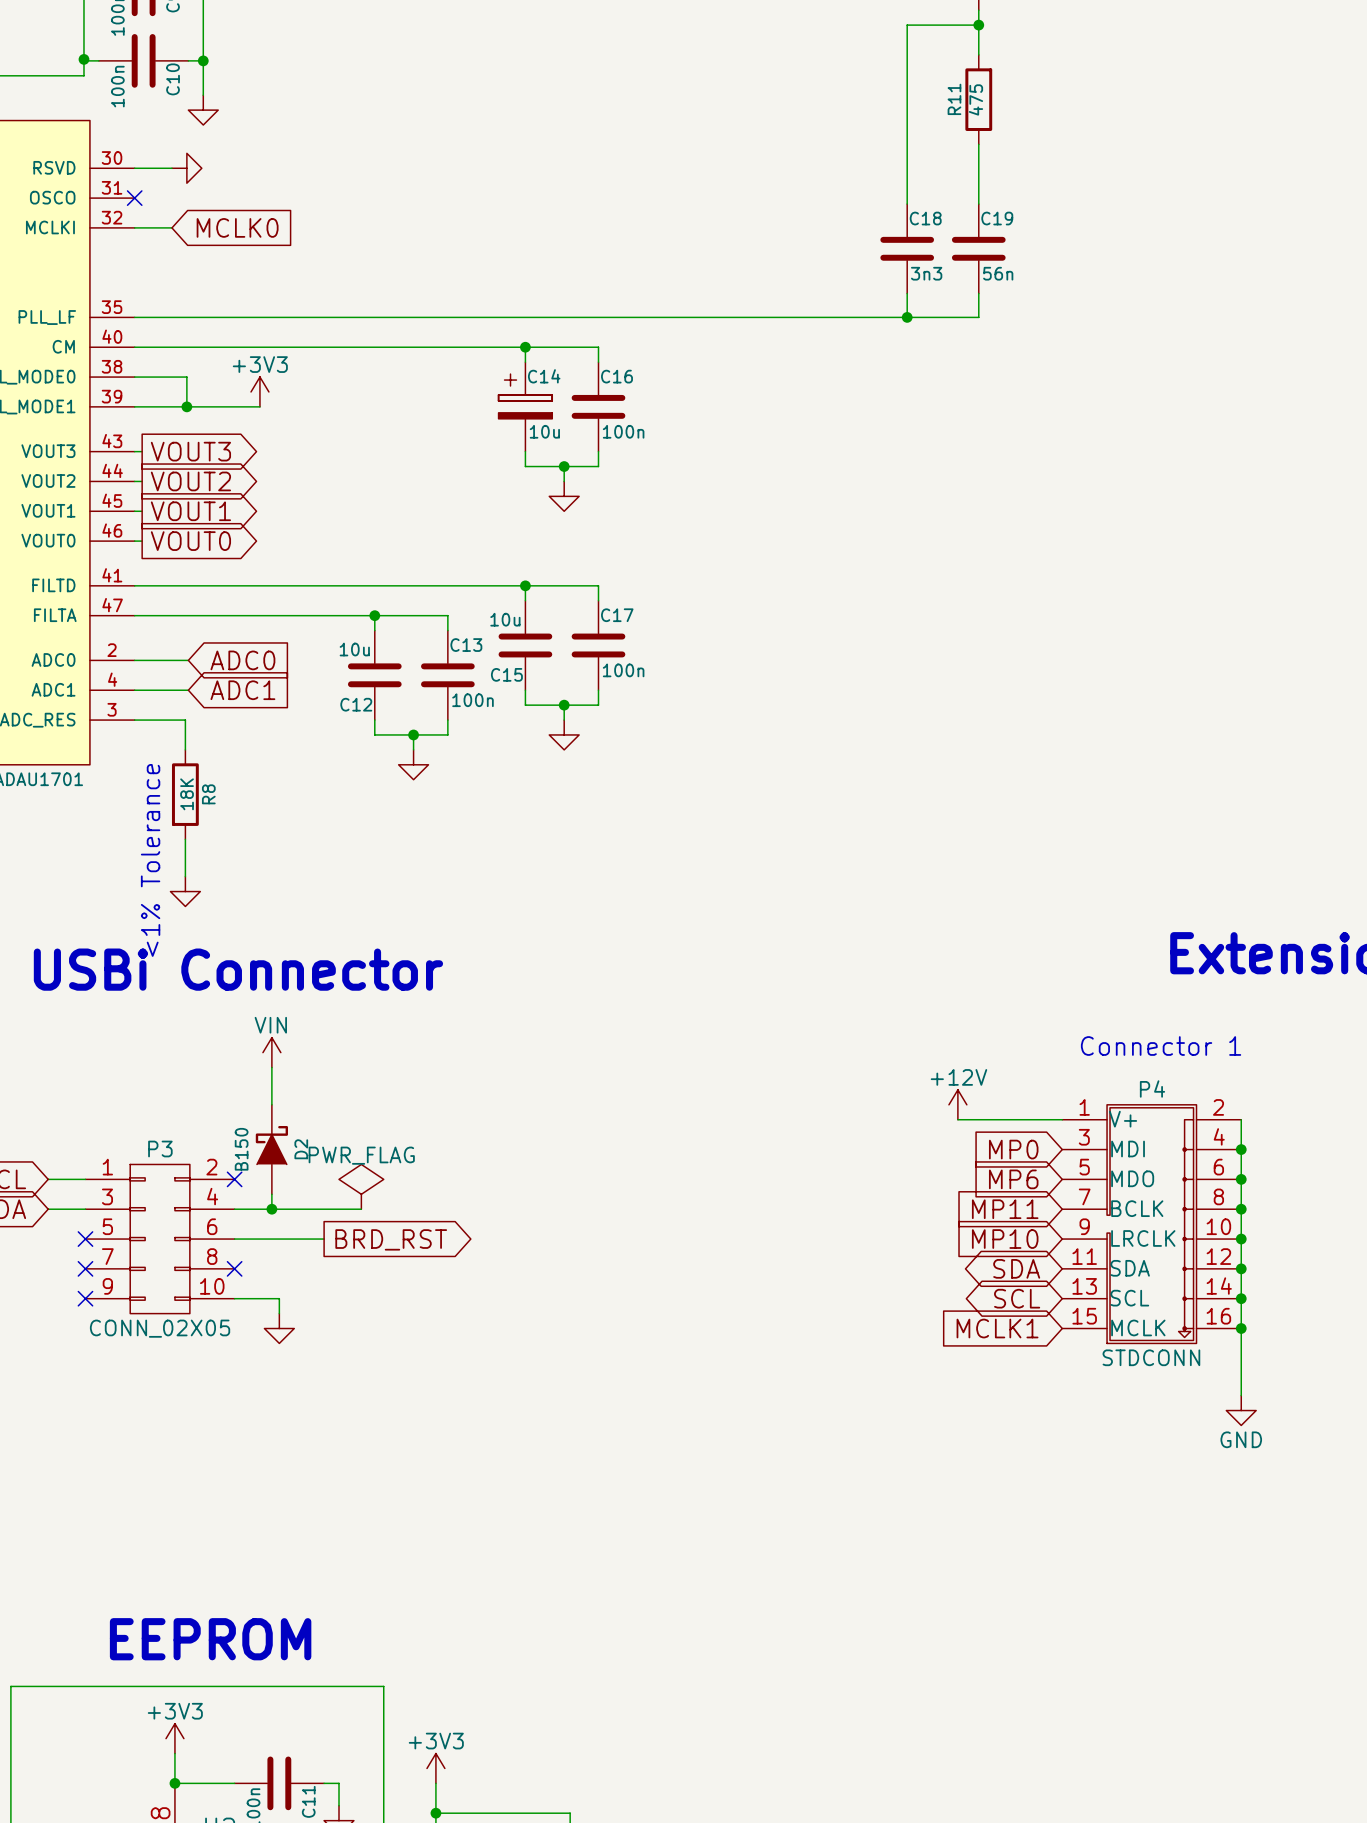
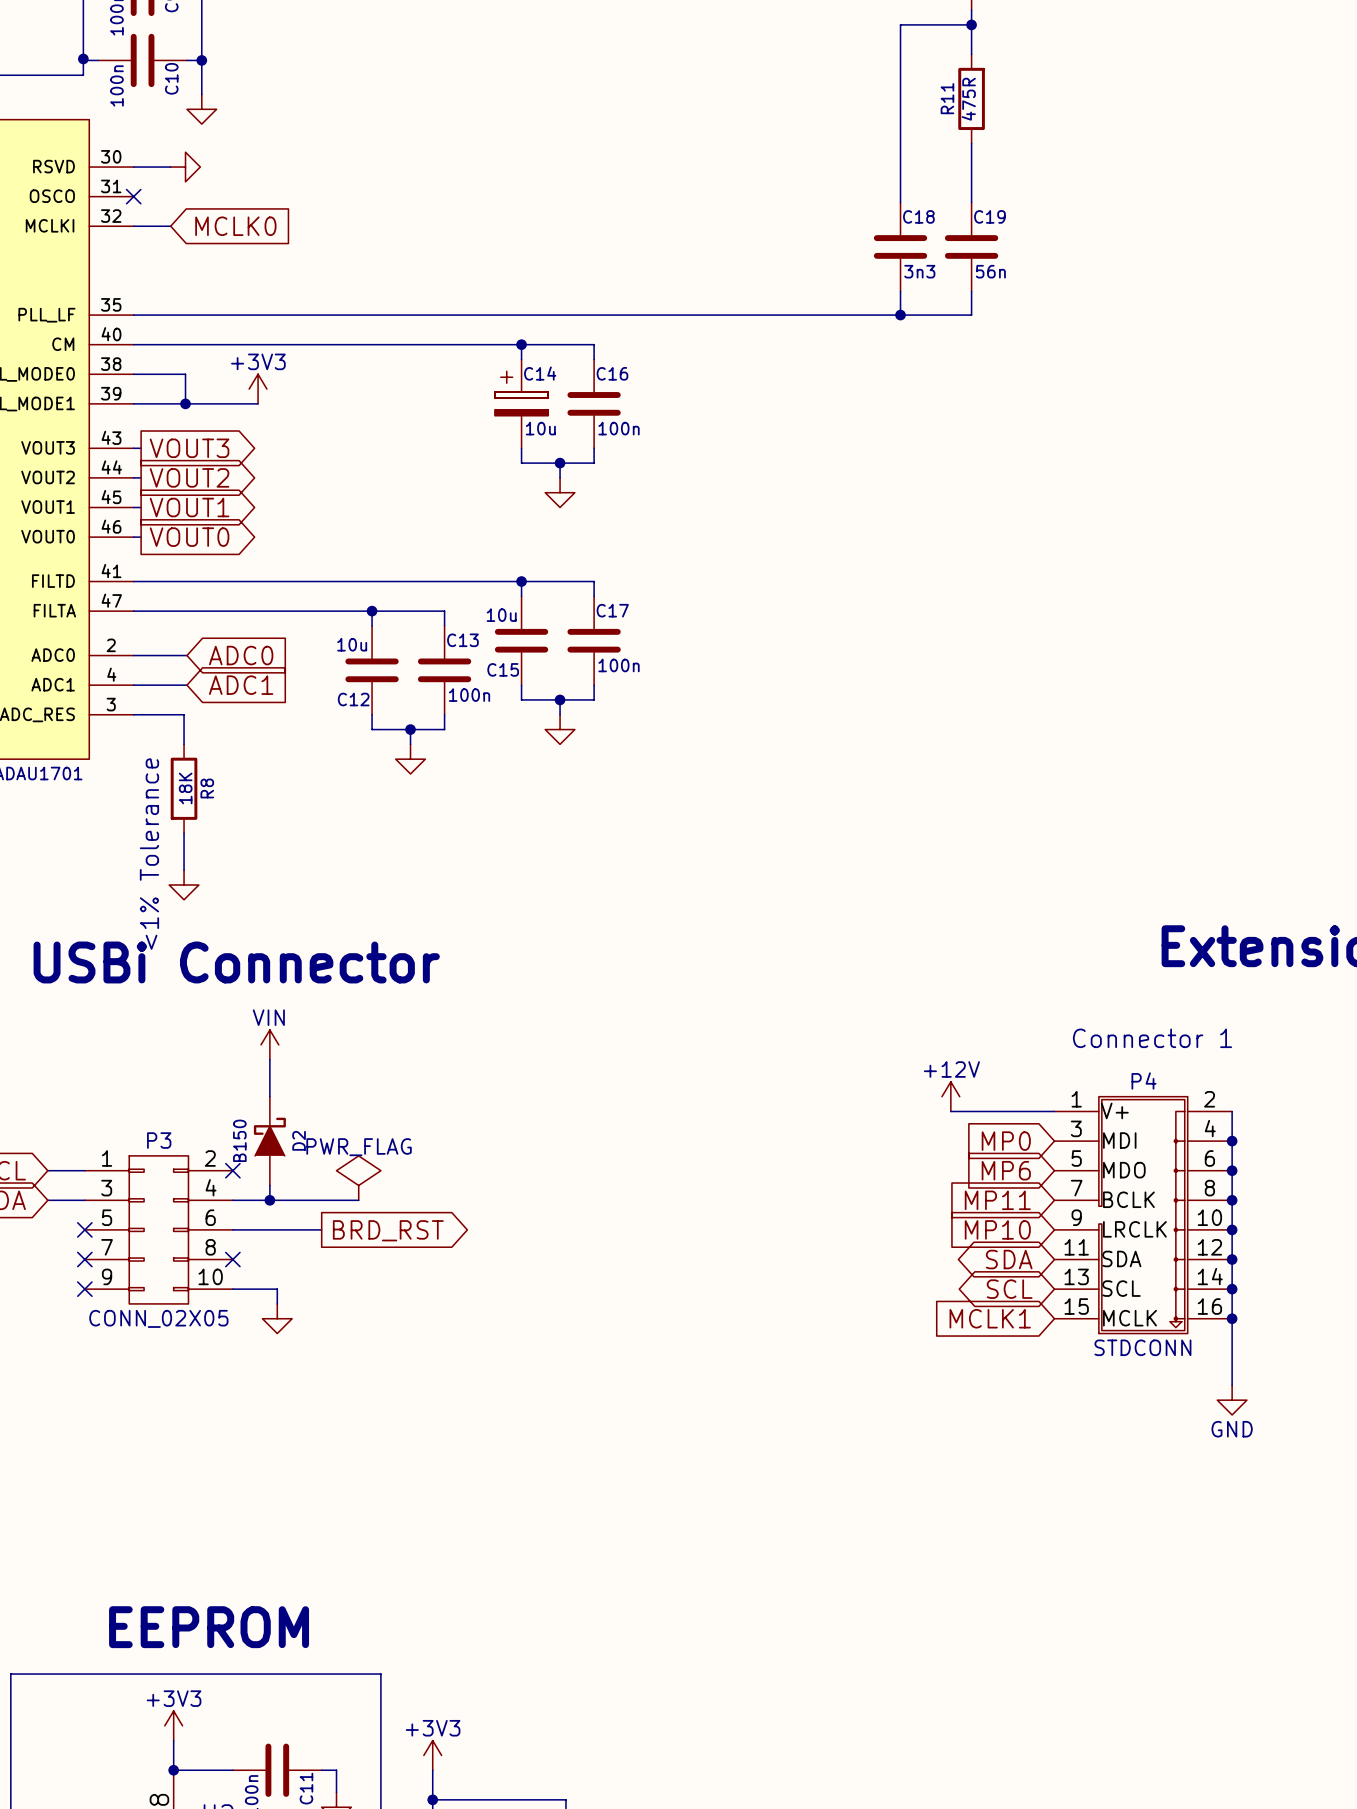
R11 value: 475 (975, 99) -> 475R (968, 99)

